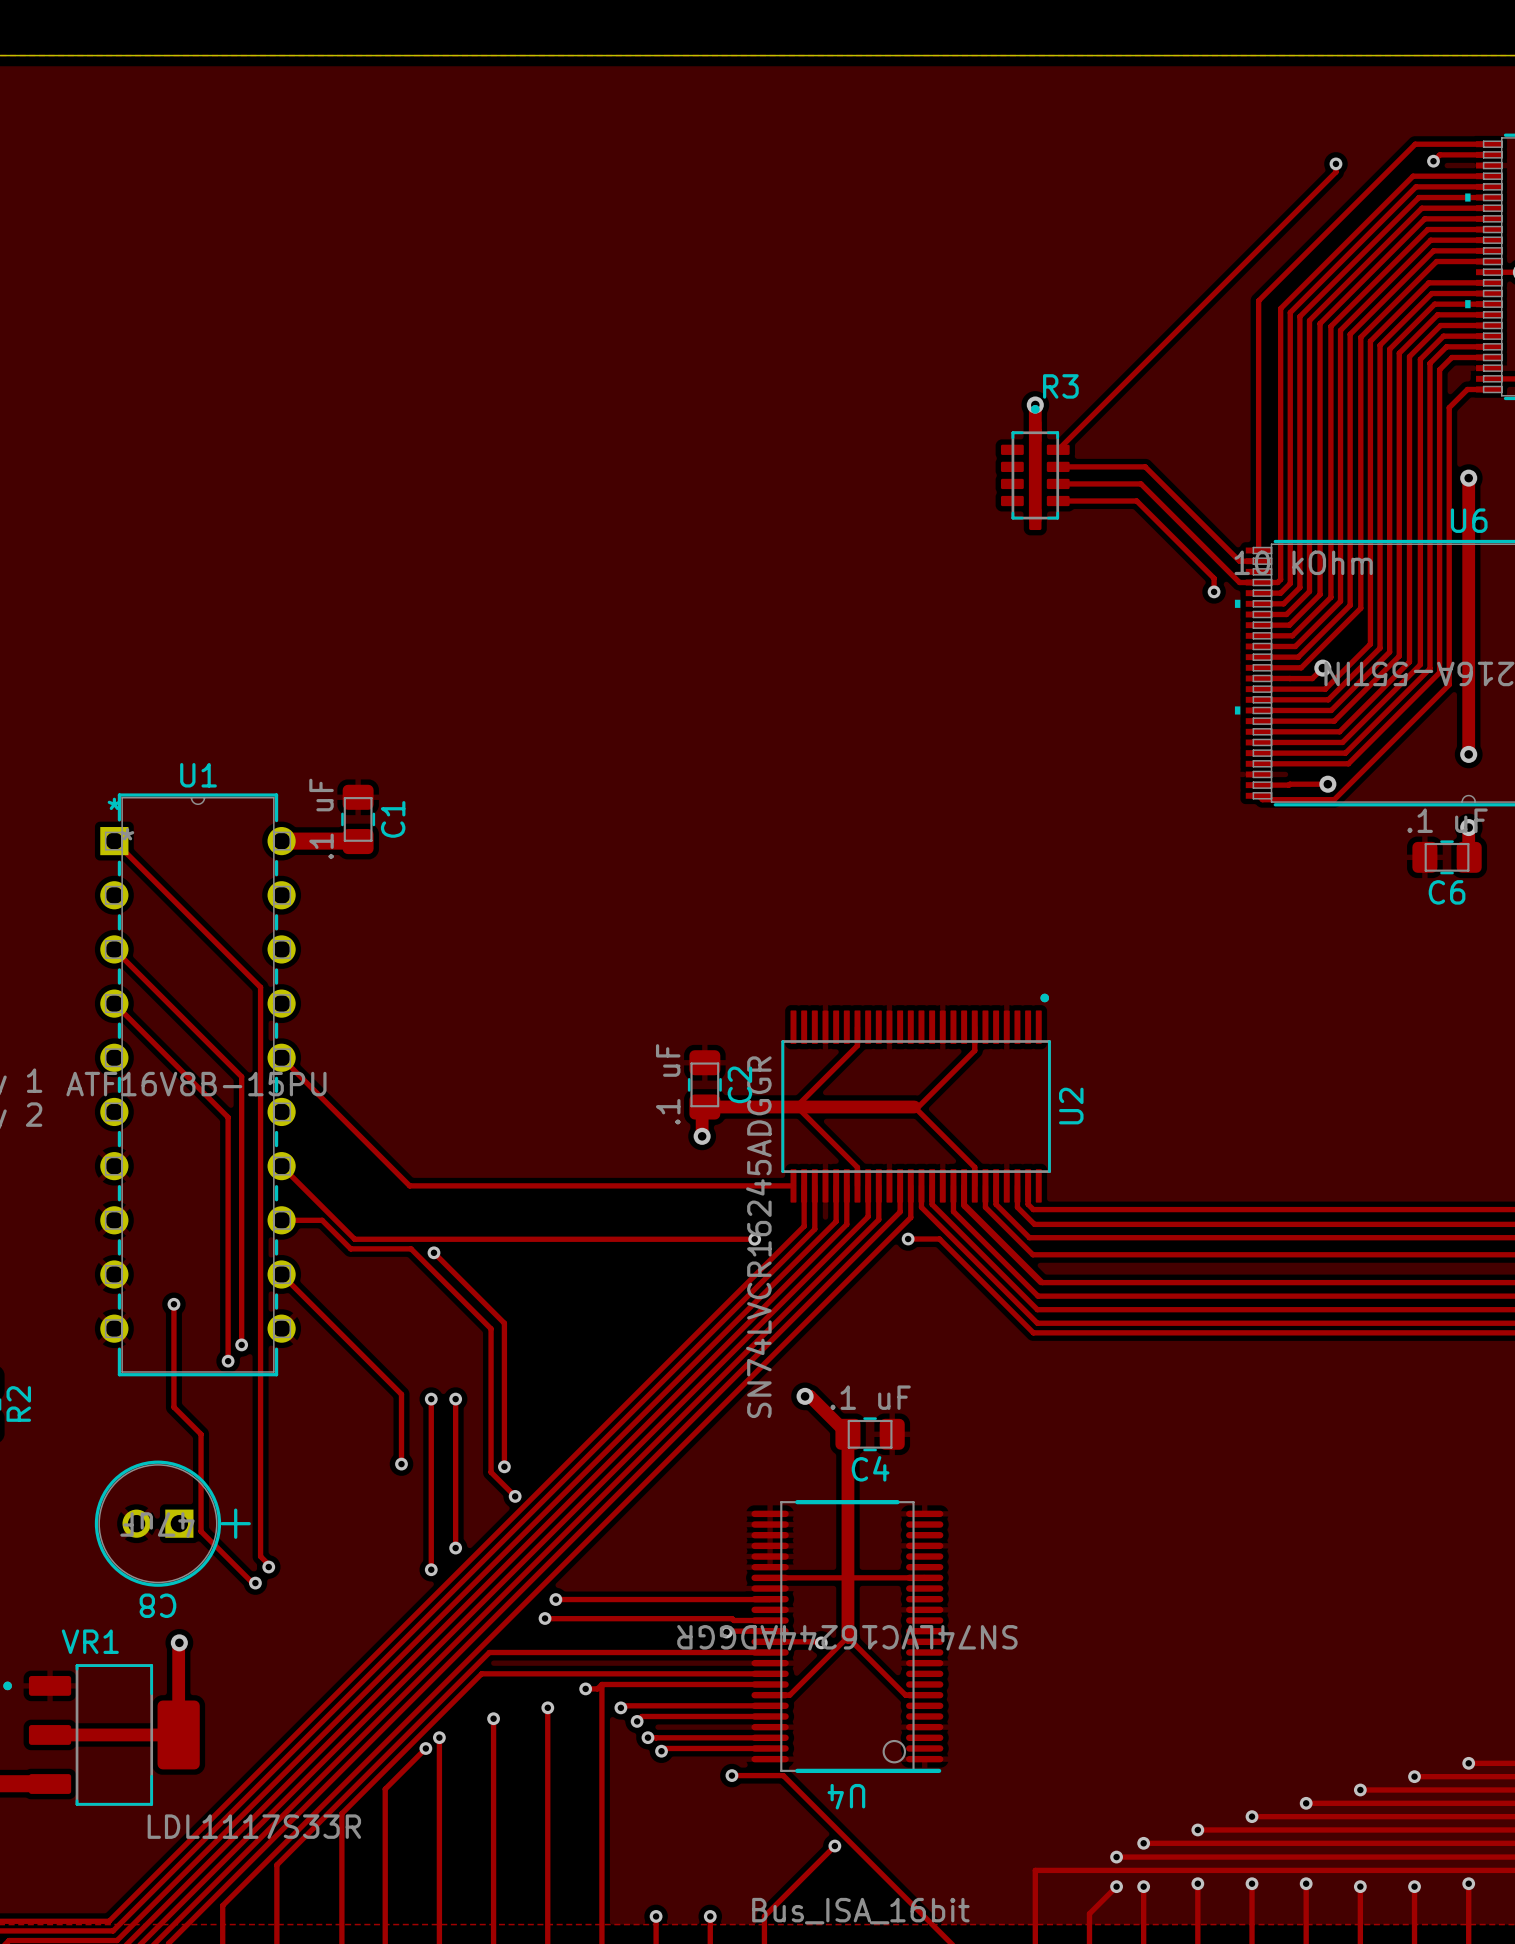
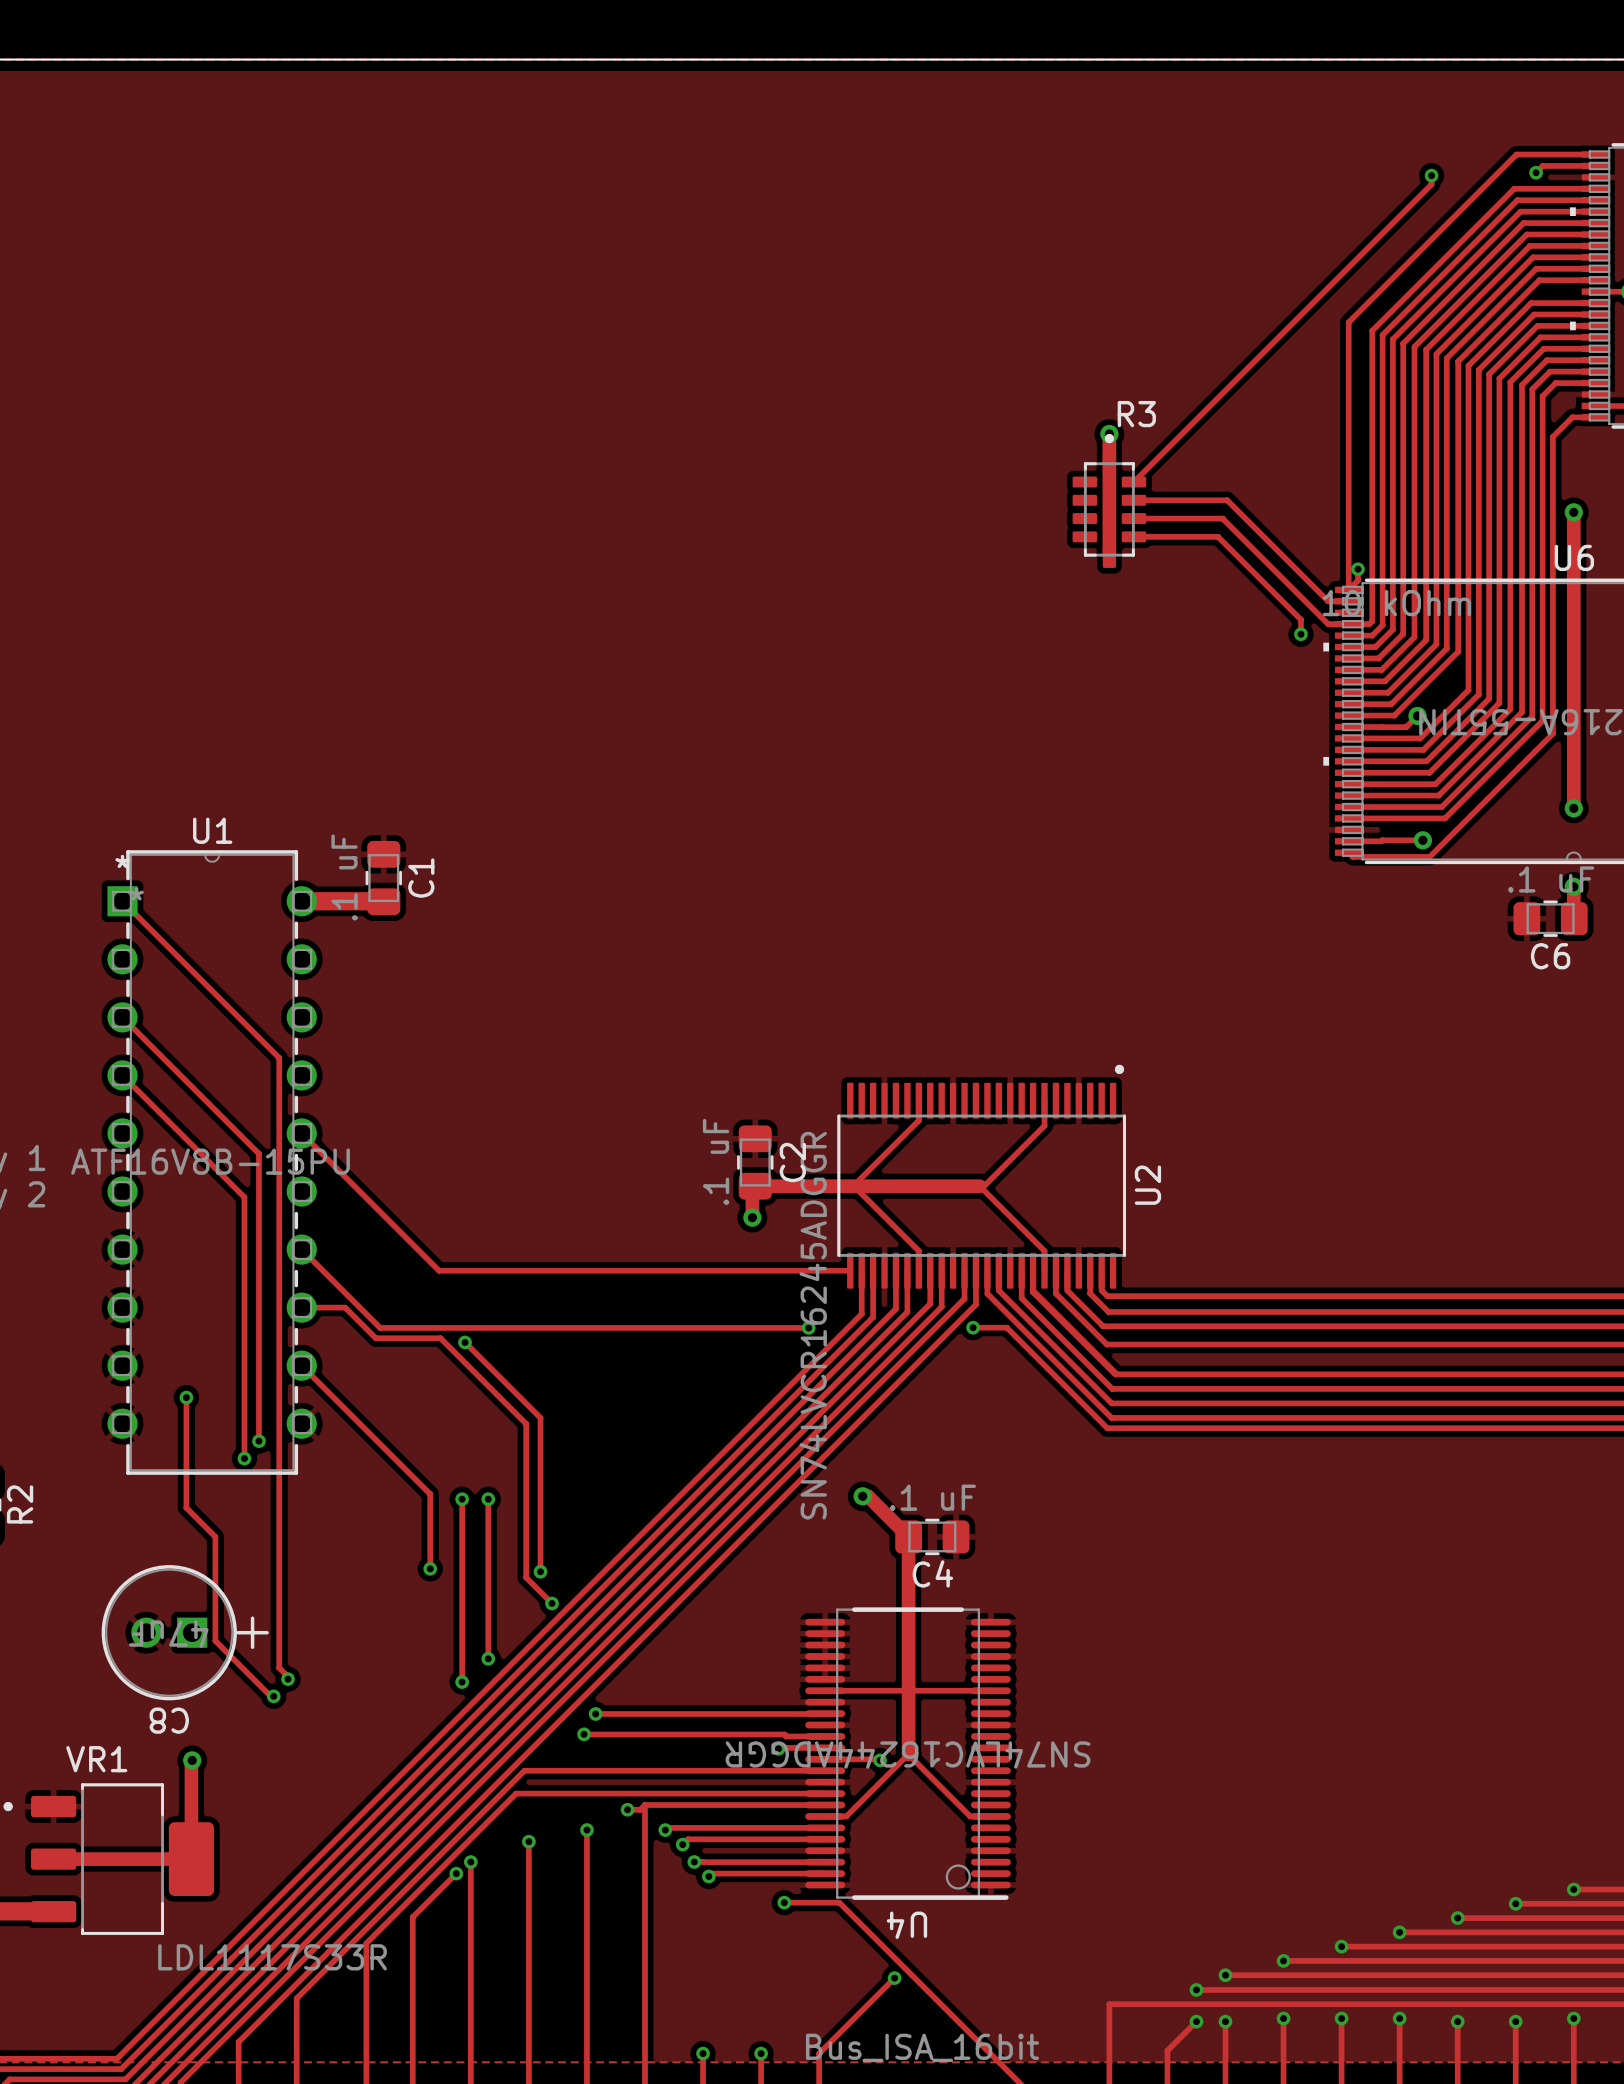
track: none -> (1358, 569) (1358, 580) (1348, 589)
via: none -> (1358, 569)

